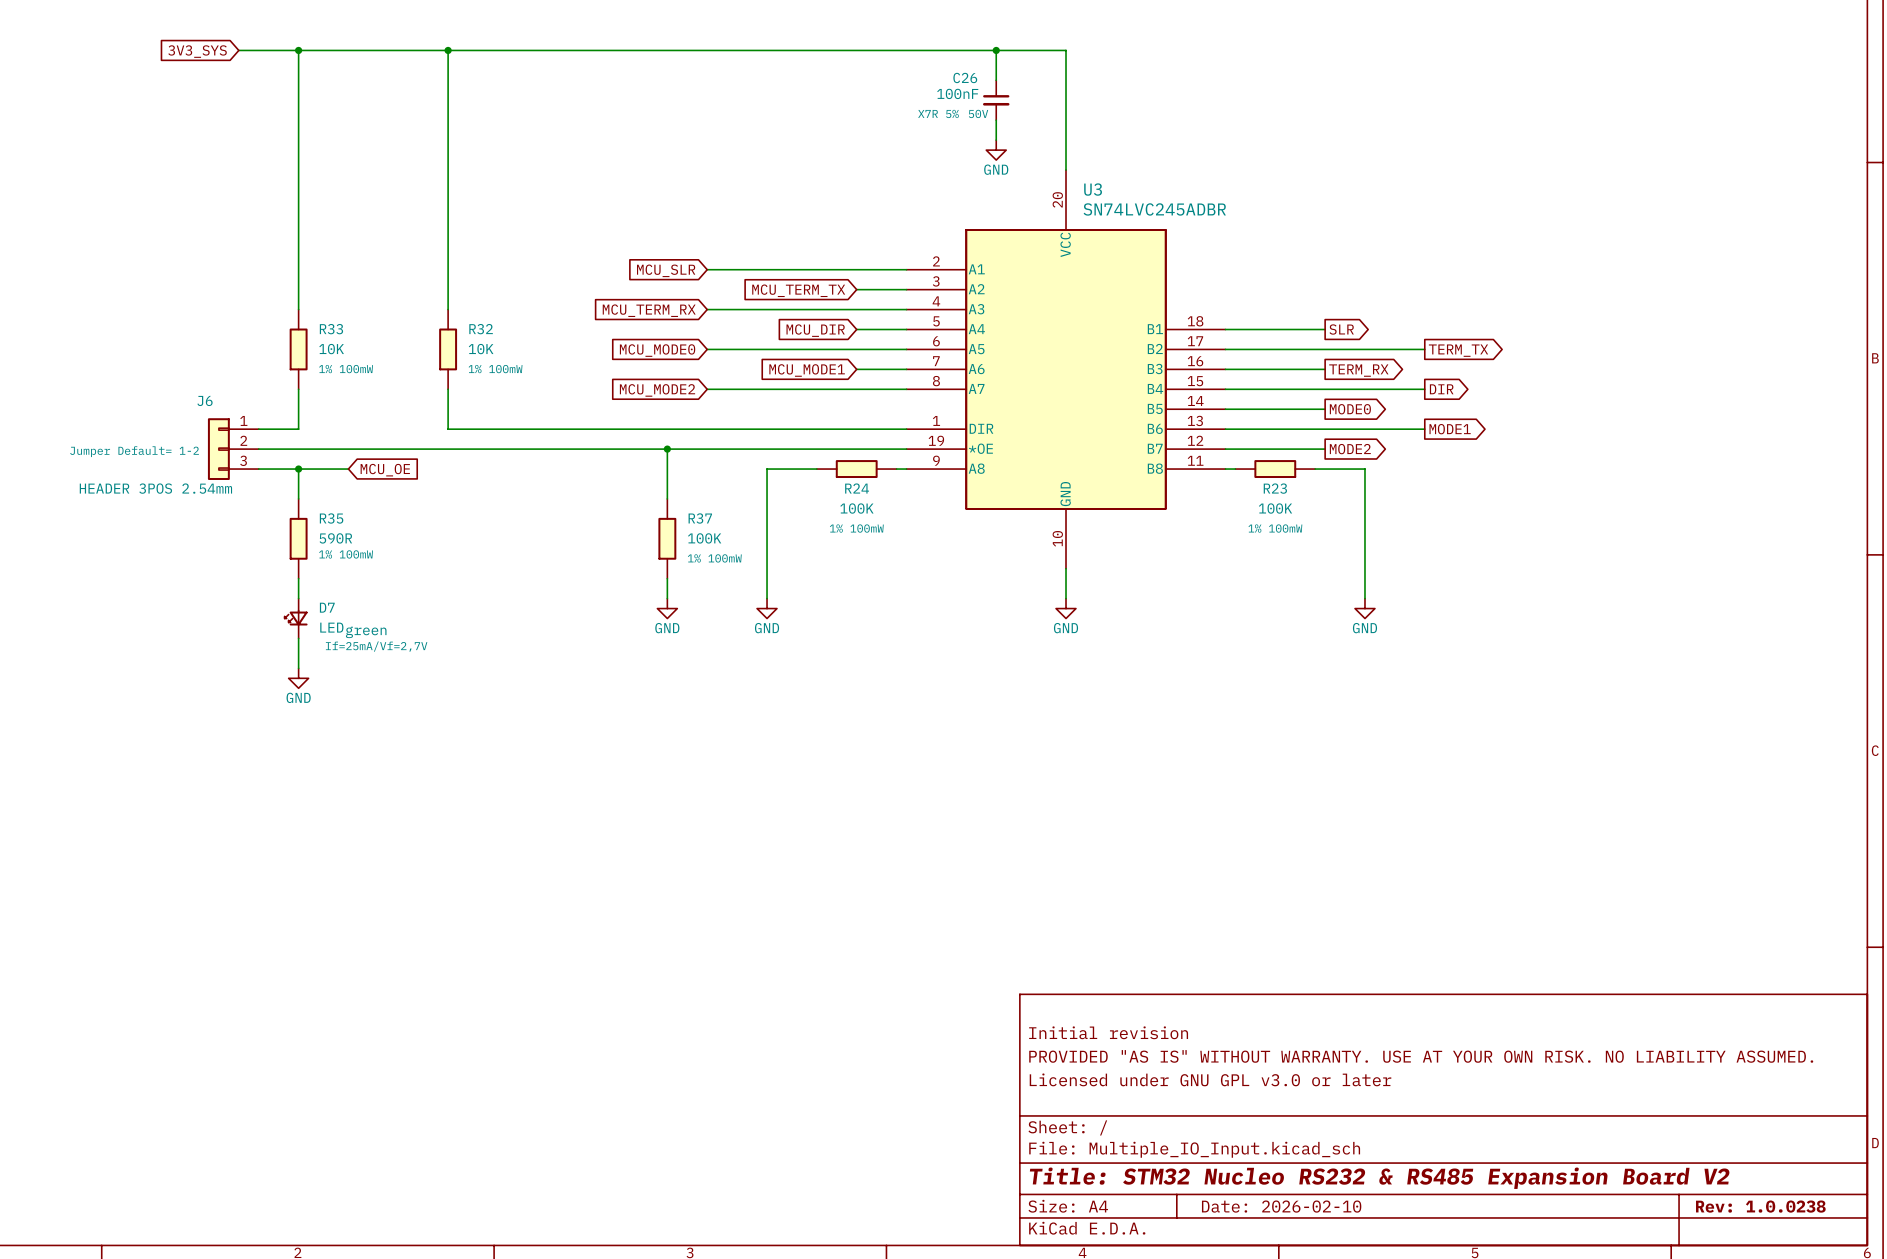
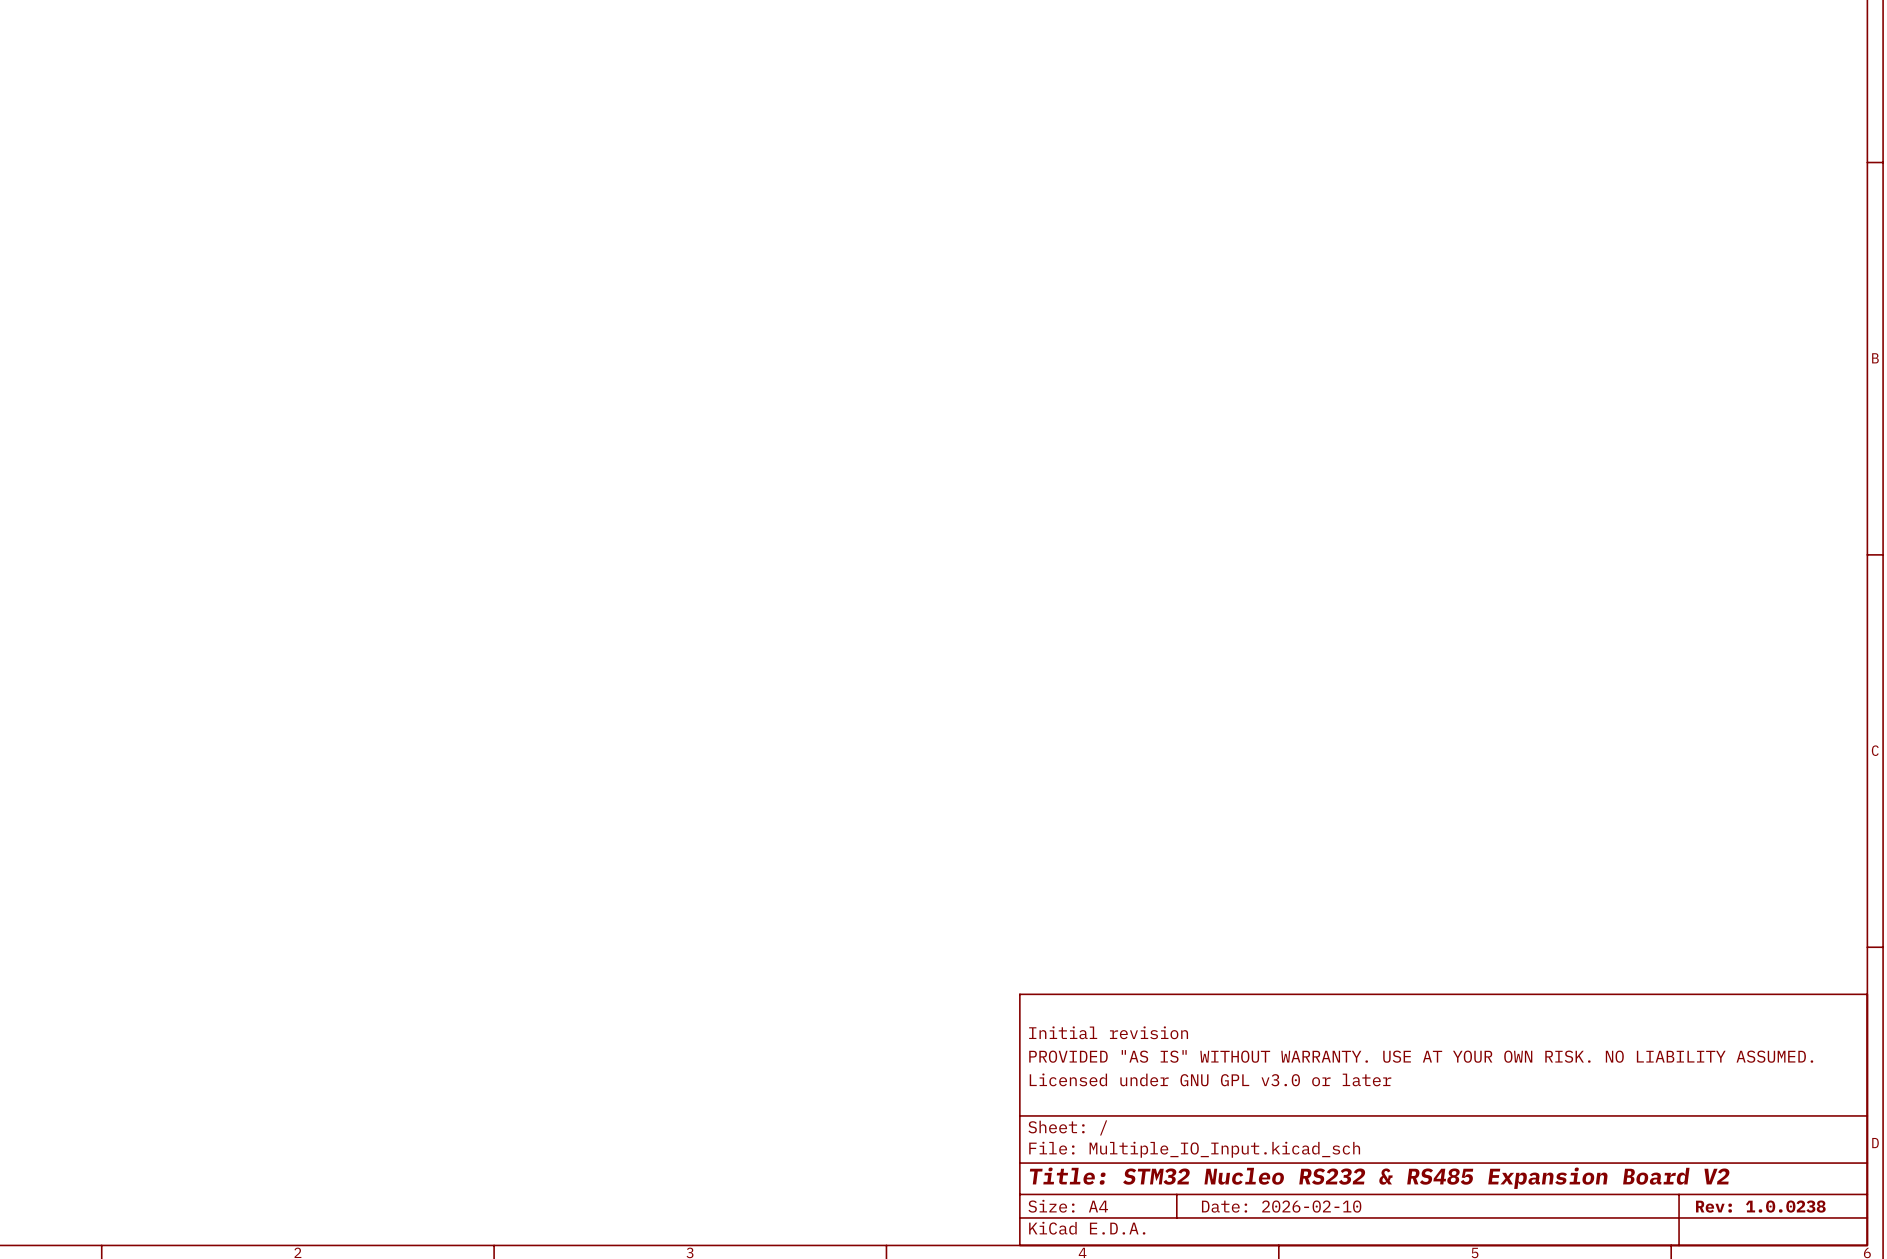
wire: (238, 50) (1066, 50) (1066, 170) -> none
wire: (298, 50) (298, 309) -> none
junction: (298, 50) -> none
wire: (448, 50) (448, 309) -> none
junction: (448, 50) -> none
wire: (996, 50) (996, 80) -> none
junction: (996, 50) -> none
global label: 3V3_SYS (197, 51) -> none
C26: 100nF (996, 100) -> none
wire: (996, 120) (996, 140) -> none
power symbol: GND (996, 150) -> none
wire: (707, 269) (906, 269) -> none
global label: MCU_SLR (666, 270) -> none
wire: (856, 289) (906, 289) -> none
global label: MCU_TERM_TX (798, 290) -> none
wire: (707, 309) (906, 309) -> none
global label: MCU_TERM_RX (649, 310) -> none
wire: (856, 329) (906, 329) -> none
wire: (1225, 329) (1325, 329) -> none
global label: SLR (1341, 329) -> none
global label: MCU_DIR (815, 330) -> none
R33: 10K (298, 349) -> none
R32: 10K (448, 349) -> none
wire: (707, 349) (906, 349) -> none
wire: (1225, 349) (1424, 349) -> none
global label: MCU_MODE0 (657, 350) -> none
global label: TERM_TX (1458, 350) -> none
wire: (856, 369) (906, 369) -> none
U3: SN74LVC245ADBR (1066, 369) -> none
wire: (1225, 369) (1325, 369) -> none
global label: MCU_MODE1 (807, 370) -> none
global label: TERM_RX (1358, 370) -> none
wire: (298, 389) (298, 429) (258, 429) -> none
wire: (448, 389) (448, 429) (906, 429) -> none
wire: (707, 389) (906, 389) -> none
wire: (1225, 389) (1424, 389) -> none
global label: DIR (1441, 389) -> none
global label: MCU_MODE2 (657, 390) -> none
wire: (1225, 409) (1325, 409) -> none
global label: MODE0 (1350, 409) -> none
wire: (1225, 429) (1424, 429) -> none
global label: MODE1 (1450, 429) -> none
J6: HEADER 3POS 2.54mm (233, 449) -> none
wire: (258, 449) (906, 449) -> none
wire: (667, 449) (667, 498) -> none
junction: (667, 449) -> none
wire: (1225, 449) (1325, 449) -> none
global label: MODE2 (1350, 449) -> none
wire: (258, 469) (348, 469) -> none
wire: (298, 469) (298, 498) -> none
junction: (298, 469) -> none
wire: (816, 469) (767, 469) (767, 598) -> none
R24: 100K (856, 469) -> none
wire: (896, 469) (906, 469) -> none
wire: (1225, 469) (1235, 469) -> none
R23: 100K (1275, 469) -> none
wire: (1315, 469) (1364, 469) (1364, 598) -> none
global label: MCU_OE (385, 470) -> none
R35: 590R (298, 538) -> none
R37: 100K (667, 538) -> none
wire: (1066, 568) (1066, 598) -> none
wire: (298, 578) (298, 598) -> none
wire: (667, 578) (667, 598) -> none
power symbol: GND (667, 608) -> none
power symbol: GND (767, 608) -> none
power symbol: GND (1066, 608) -> none
power symbol: GND (1364, 608) -> none
D7: LED (296, 618) -> none
wire: (298, 638) (298, 668) -> none
power symbol: GND (298, 678) -> none

